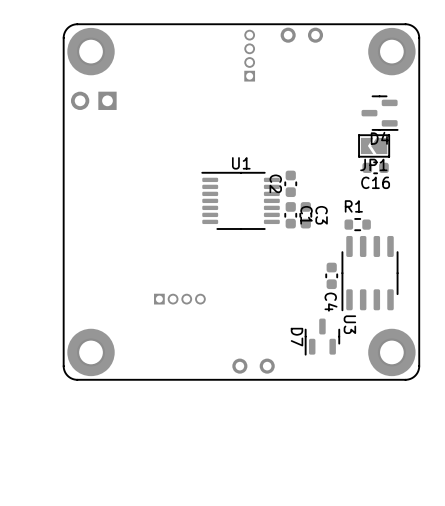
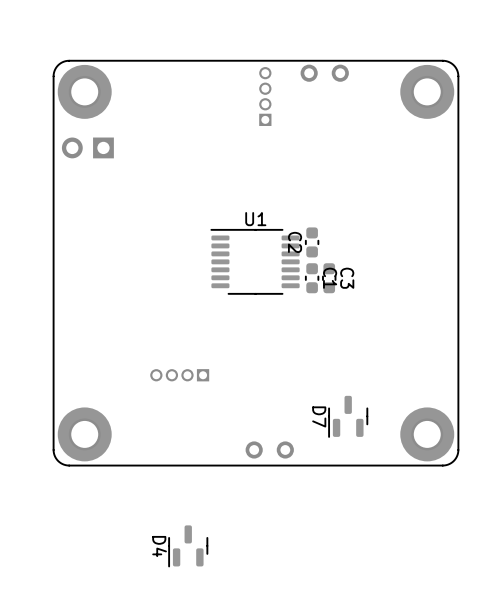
D4 rotation: 0° (379, 113) -> 90° clockwise (188, 546)
D4 position: (379, 113) -> (188, 546)
JP1: (374, 145) -> none
C16: (375, 167) -> none
R1: (357, 224) -> none
U3: (369, 273) -> none
C4: (331, 275) -> none
part rotation: 0° (179, 299) -> 180° (179, 375)

